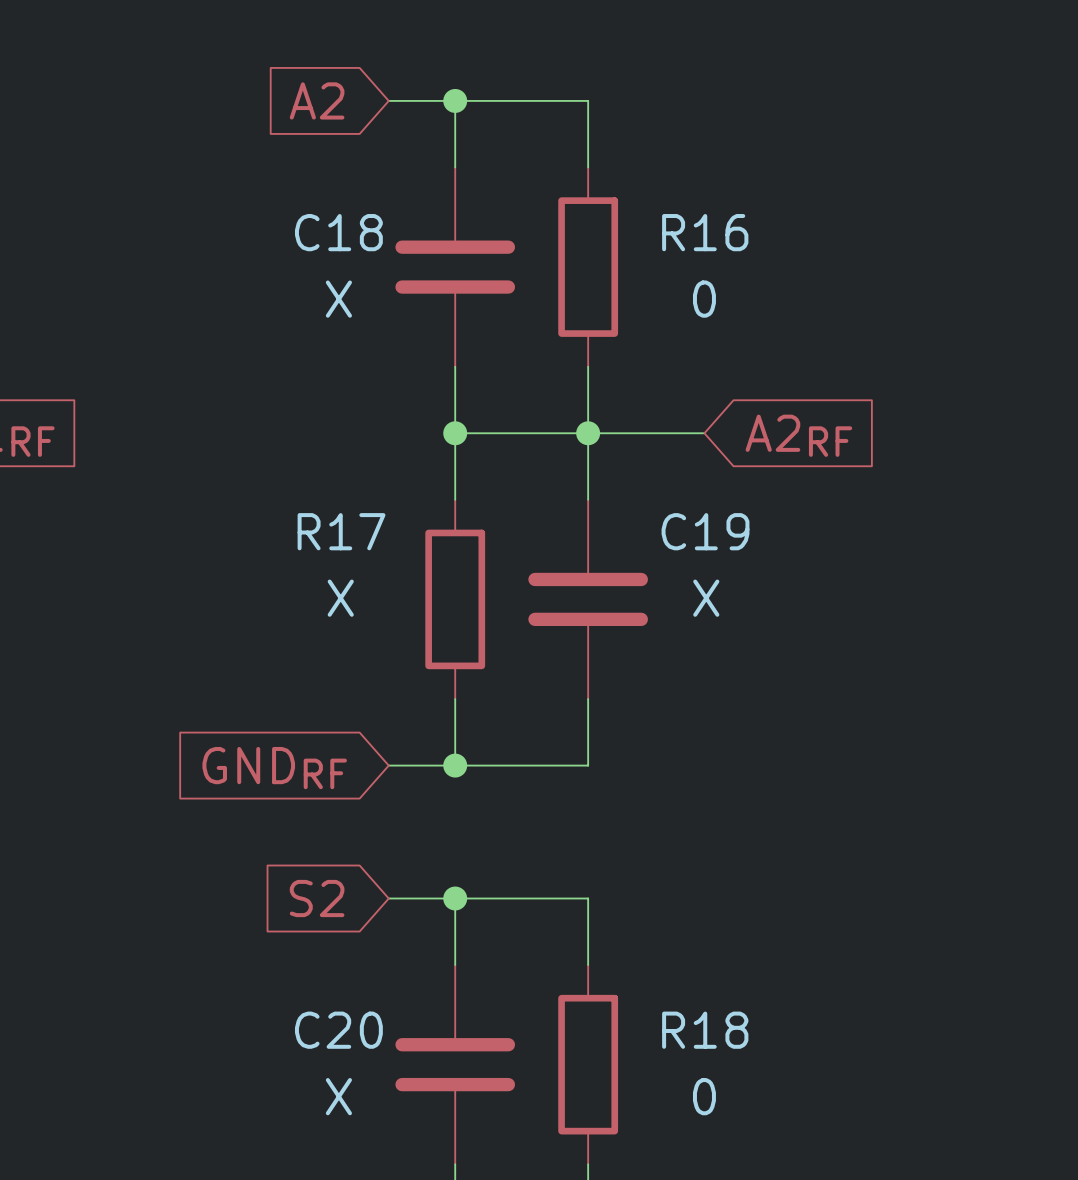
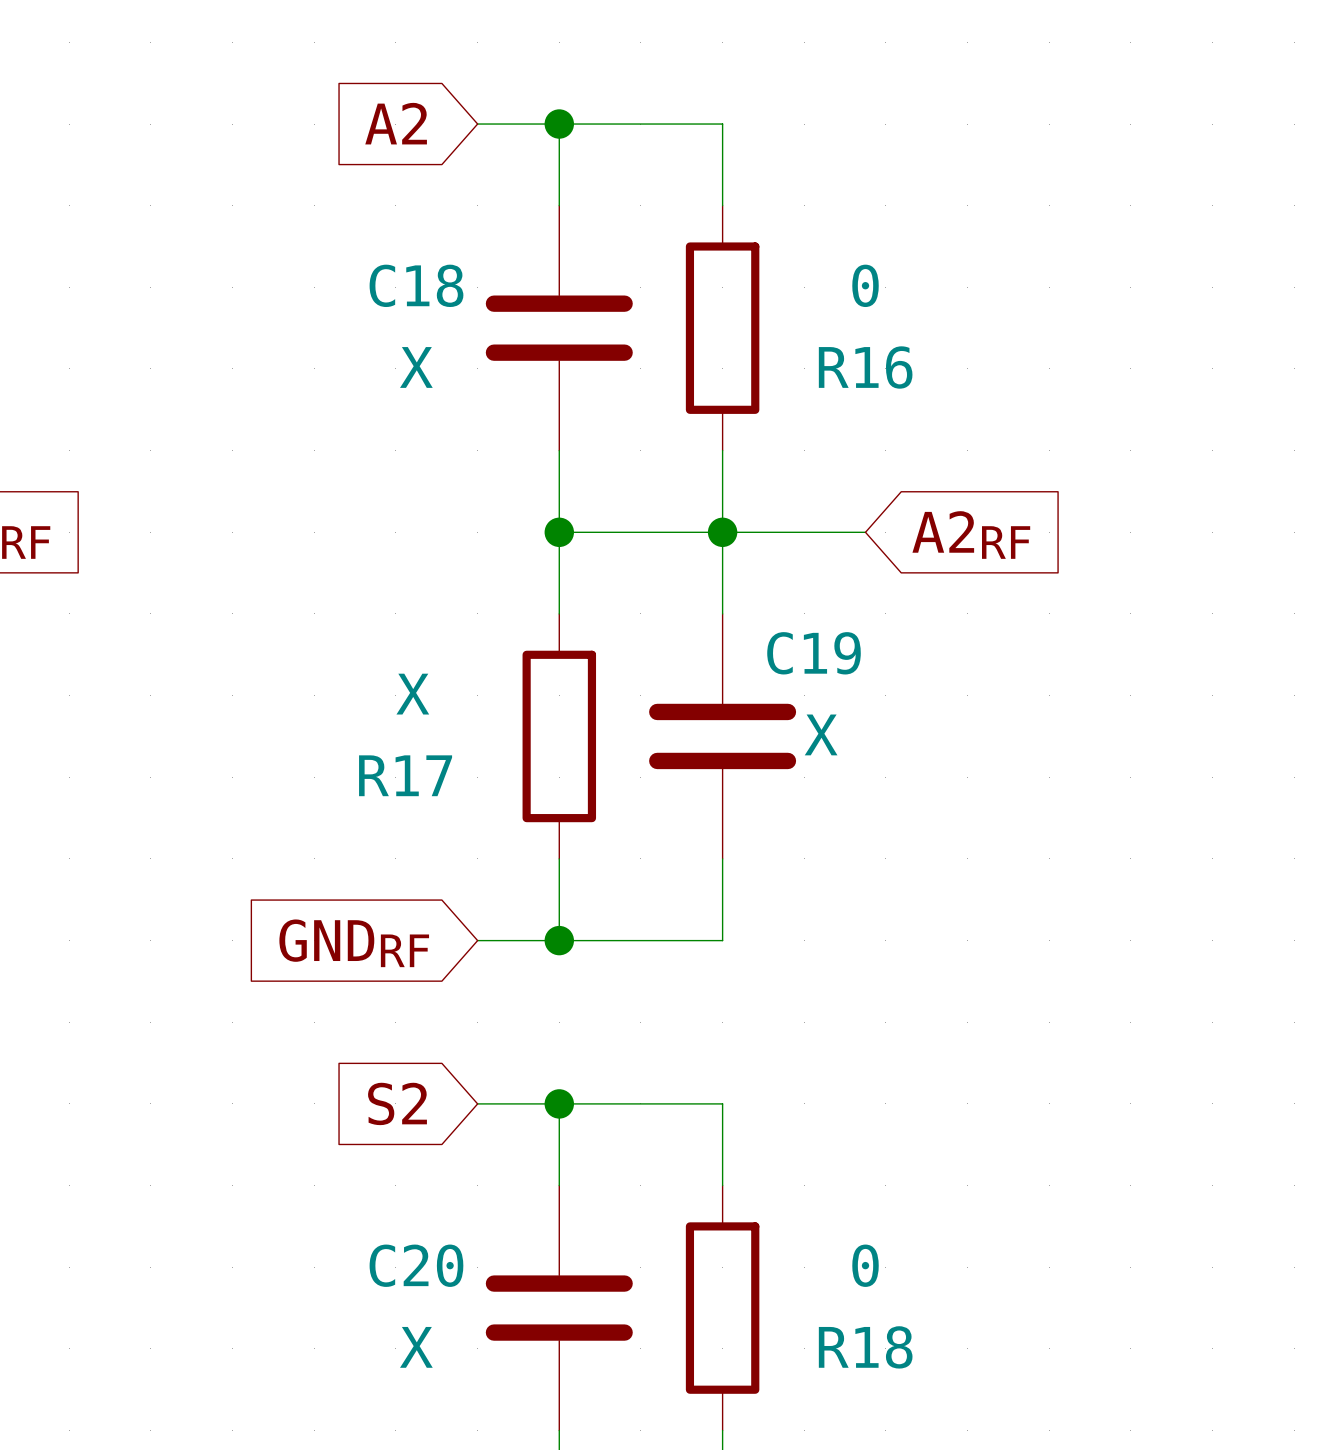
R16 name position: R16 (705, 232) -> R16 (865, 367)
R16 value position: 0 (704, 299) -> 0 (865, 285)
R17 name position: R17 (341, 531) -> R17 (405, 775)
C19 name position: C19 (705, 531) -> C19 (814, 653)
R17 value position: X (340, 598) -> X (412, 694)
C19 value position: X (706, 598) -> X (821, 734)
R18 name position: R18 (705, 1030) -> R18 (865, 1347)
R18 value position: 0 (704, 1096) -> 0 (865, 1265)

